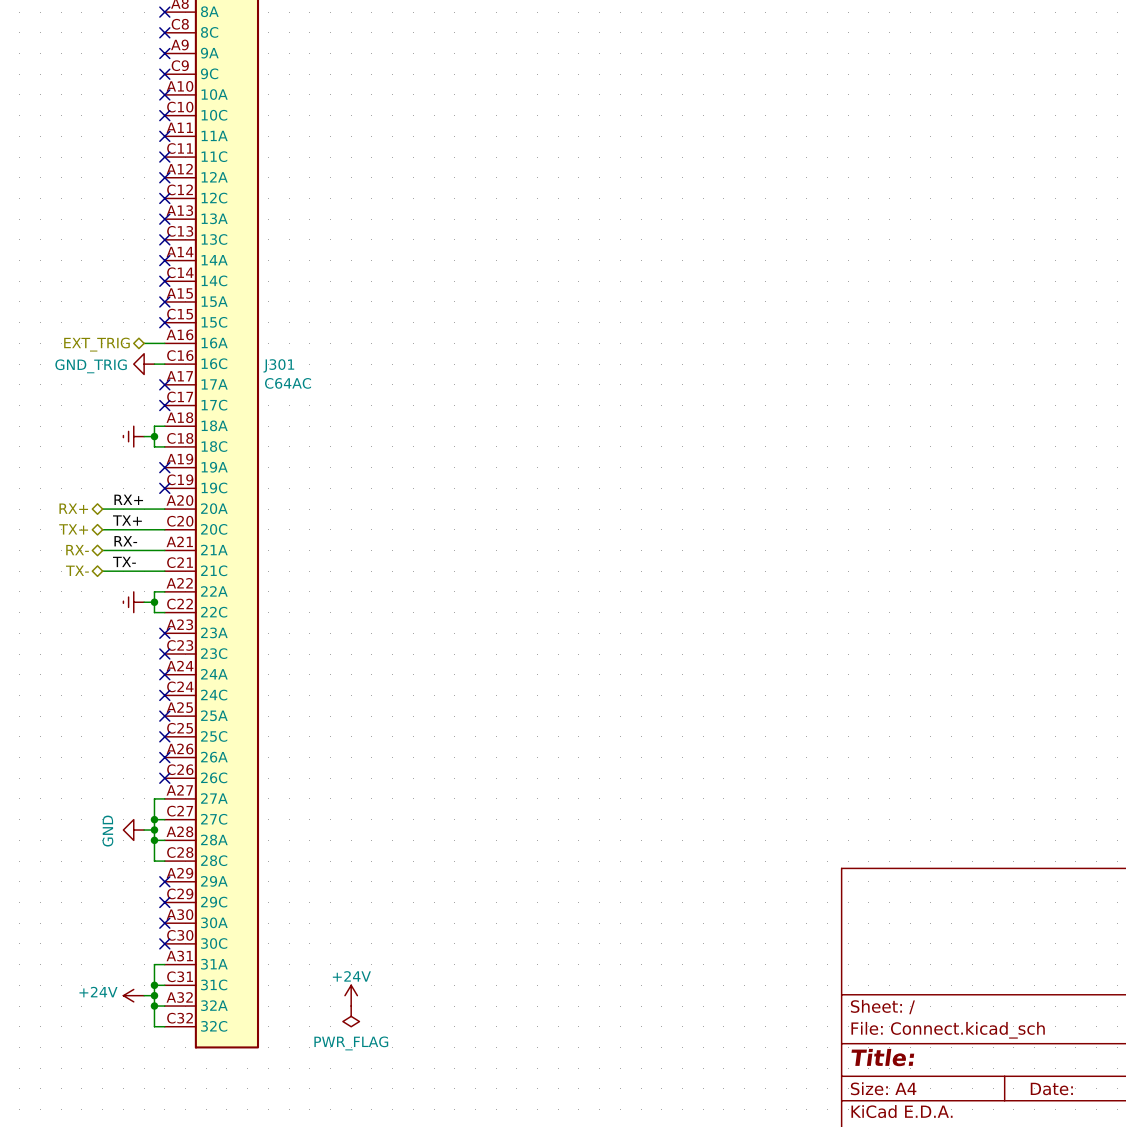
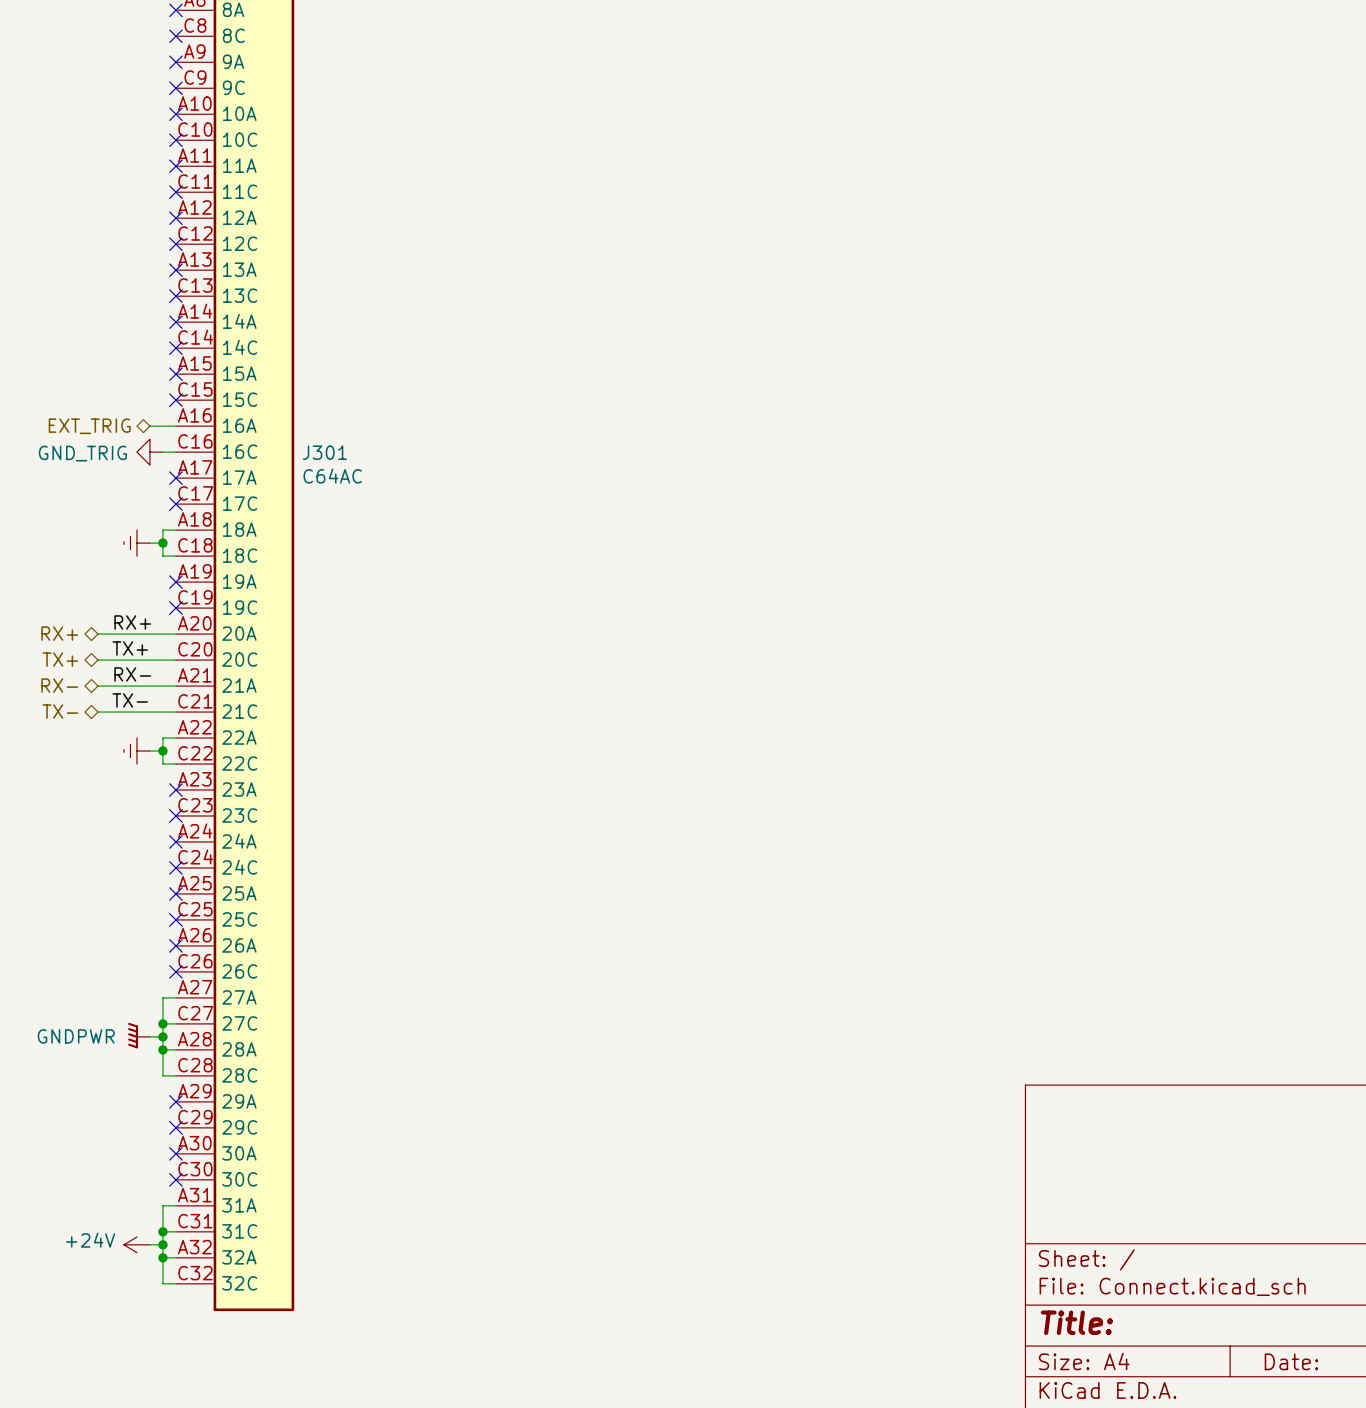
power symbol: GND (133, 830) -> GNDPWR (139, 1035)
power symbol: +24V (351, 995) -> none
power symbol: PWR_FLAG (351, 1016) -> none

